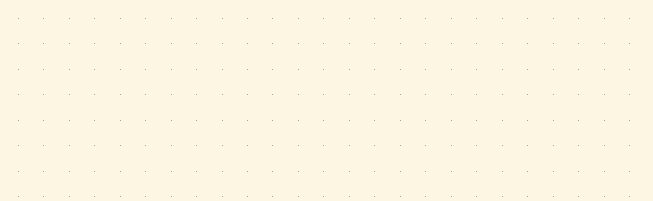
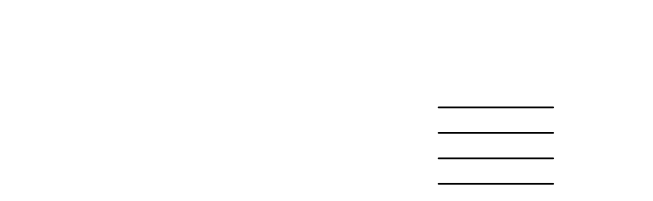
wire: none -> (438, 107) (553, 107)
wire: none -> (438, 132) (553, 132)
wire: none -> (438, 158) (553, 158)
wire: none -> (438, 183) (553, 183)

